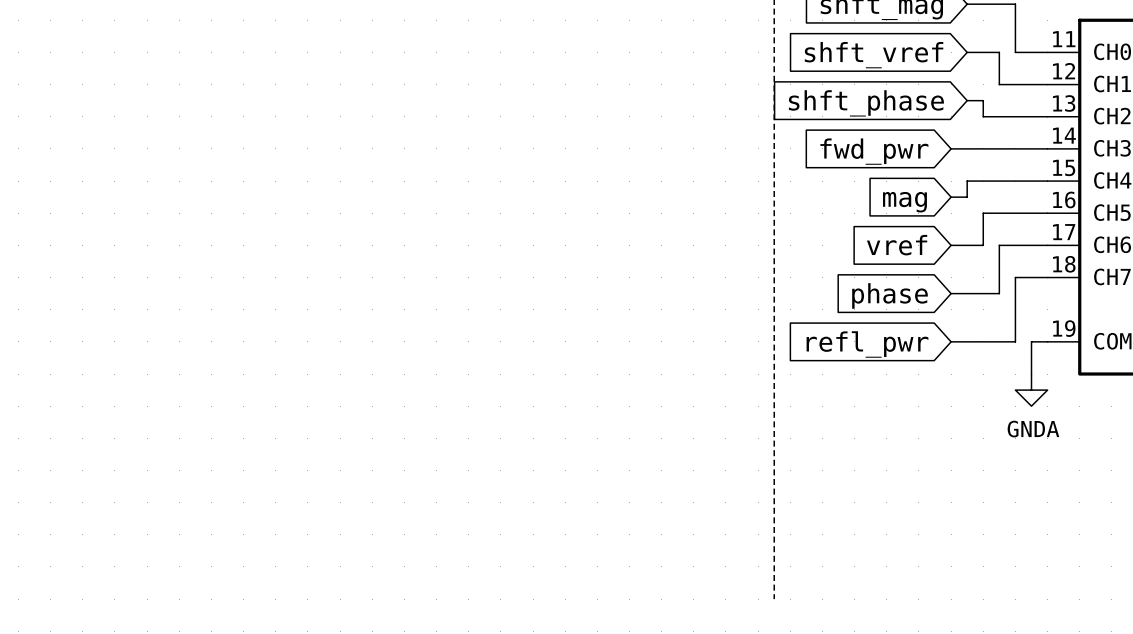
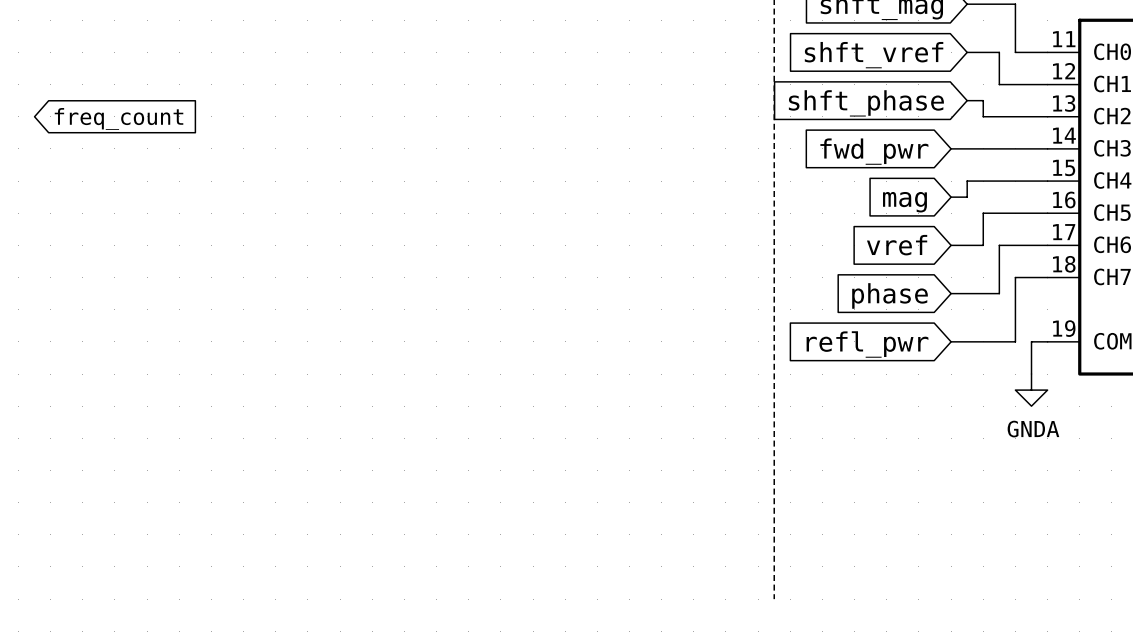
global label: none -> freq_count (119, 119)

